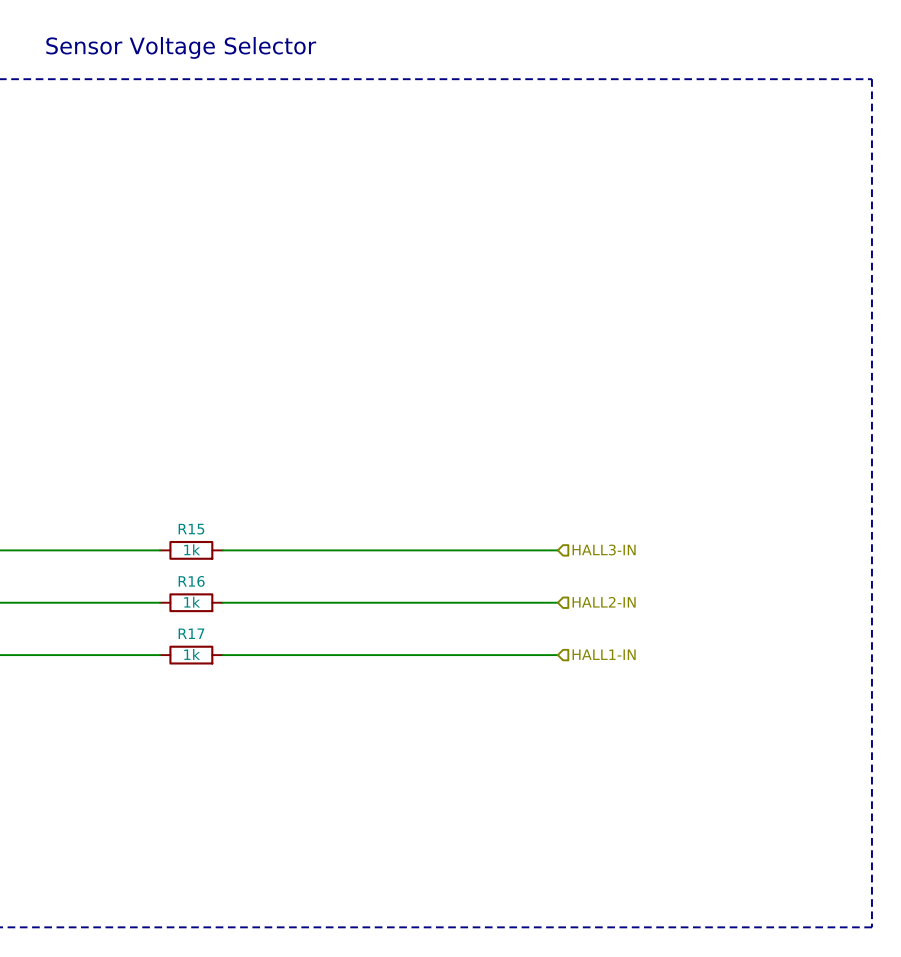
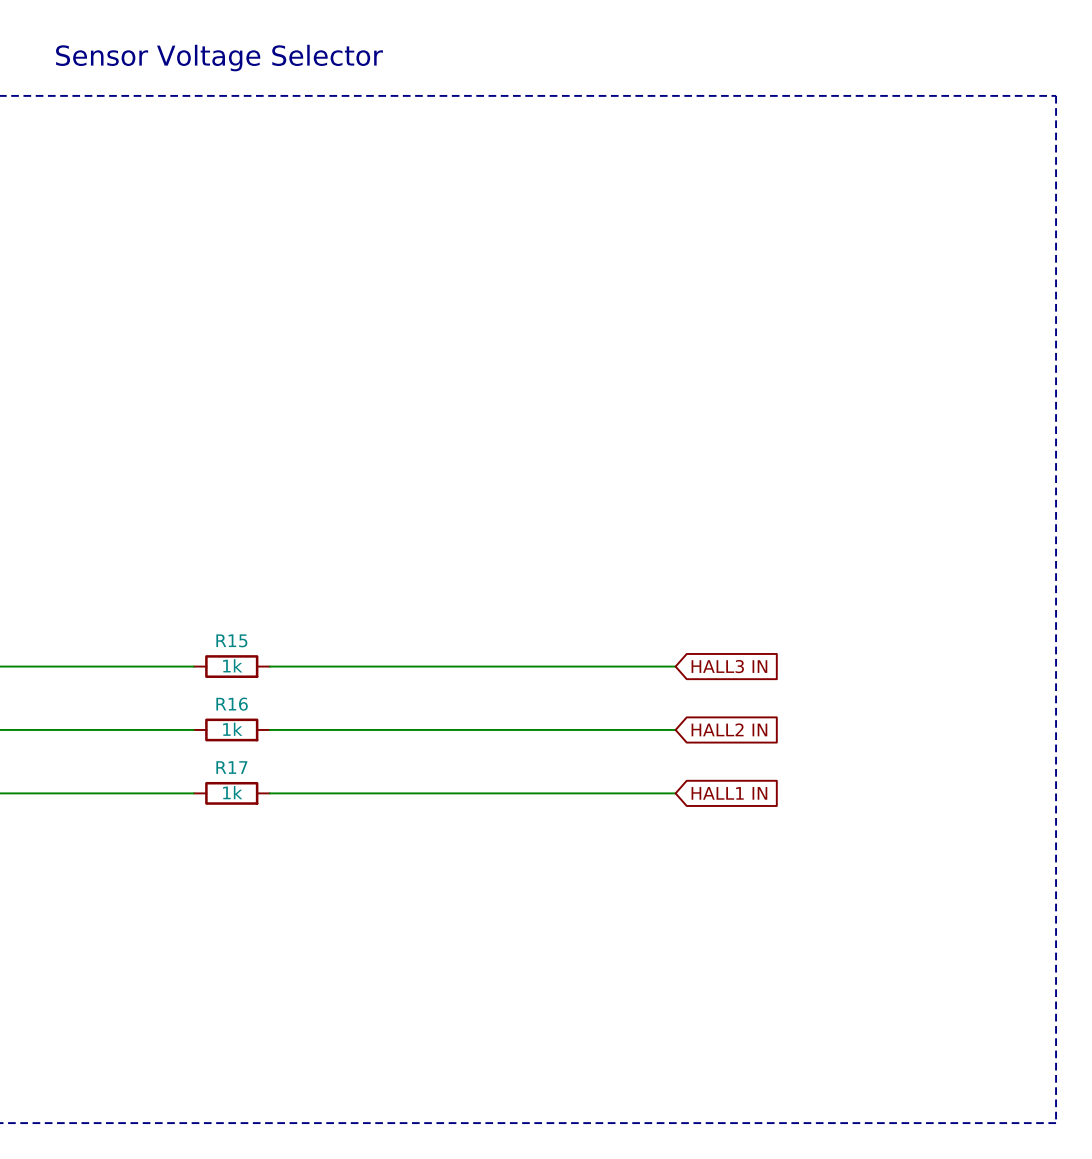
global label: none -> HALL3 IN (729, 666)
hierarchical label: HALL3-IN (604, 550) -> none
global label: none -> HALL2 IN (729, 729)
hierarchical label: HALL2-IN (604, 602) -> none
hierarchical label: HALL1-IN (604, 654) -> none
global label: none -> HALL1 IN (729, 793)

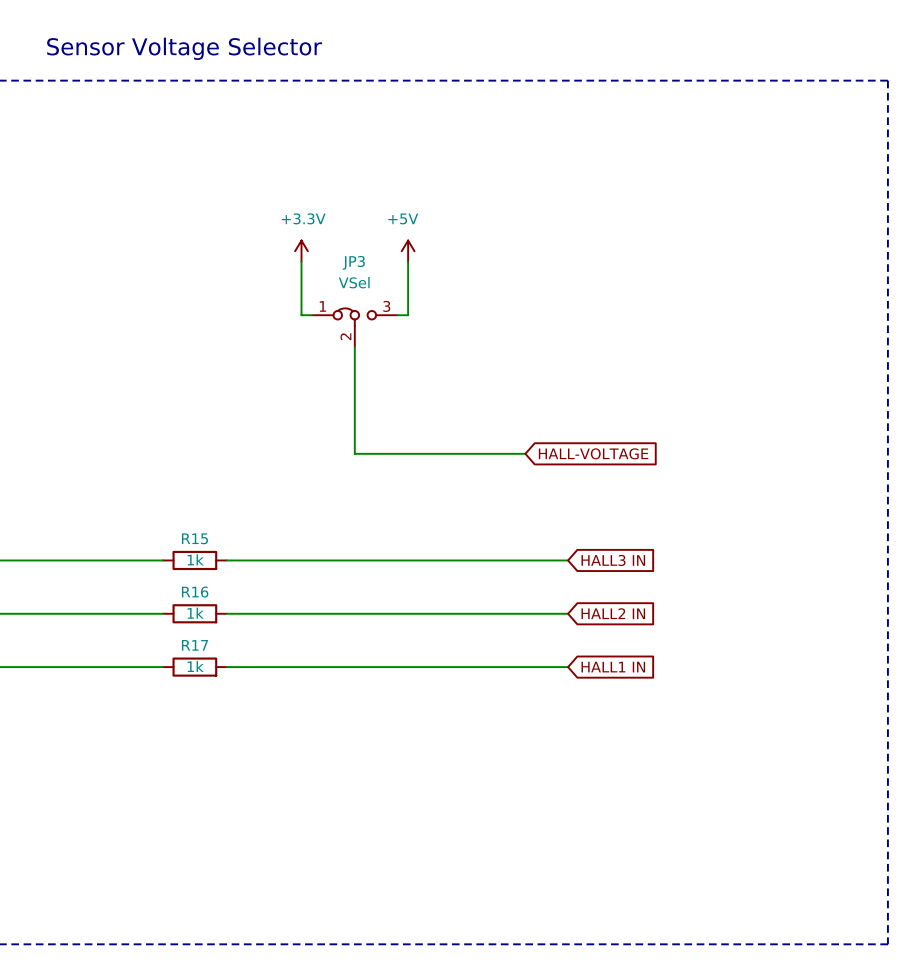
power symbol: none -> +3.3V (301, 251)
power symbol: none -> +5V (408, 251)
wire: none -> (301, 261) (301, 315) (312, 315)
wire: none -> (408, 261) (408, 315) (397, 315)
JP3: none -> VSel (354, 327)
wire: none -> (354, 347) (354, 453) (525, 453)
global label: none -> HALL-VOLTAGE (593, 453)

